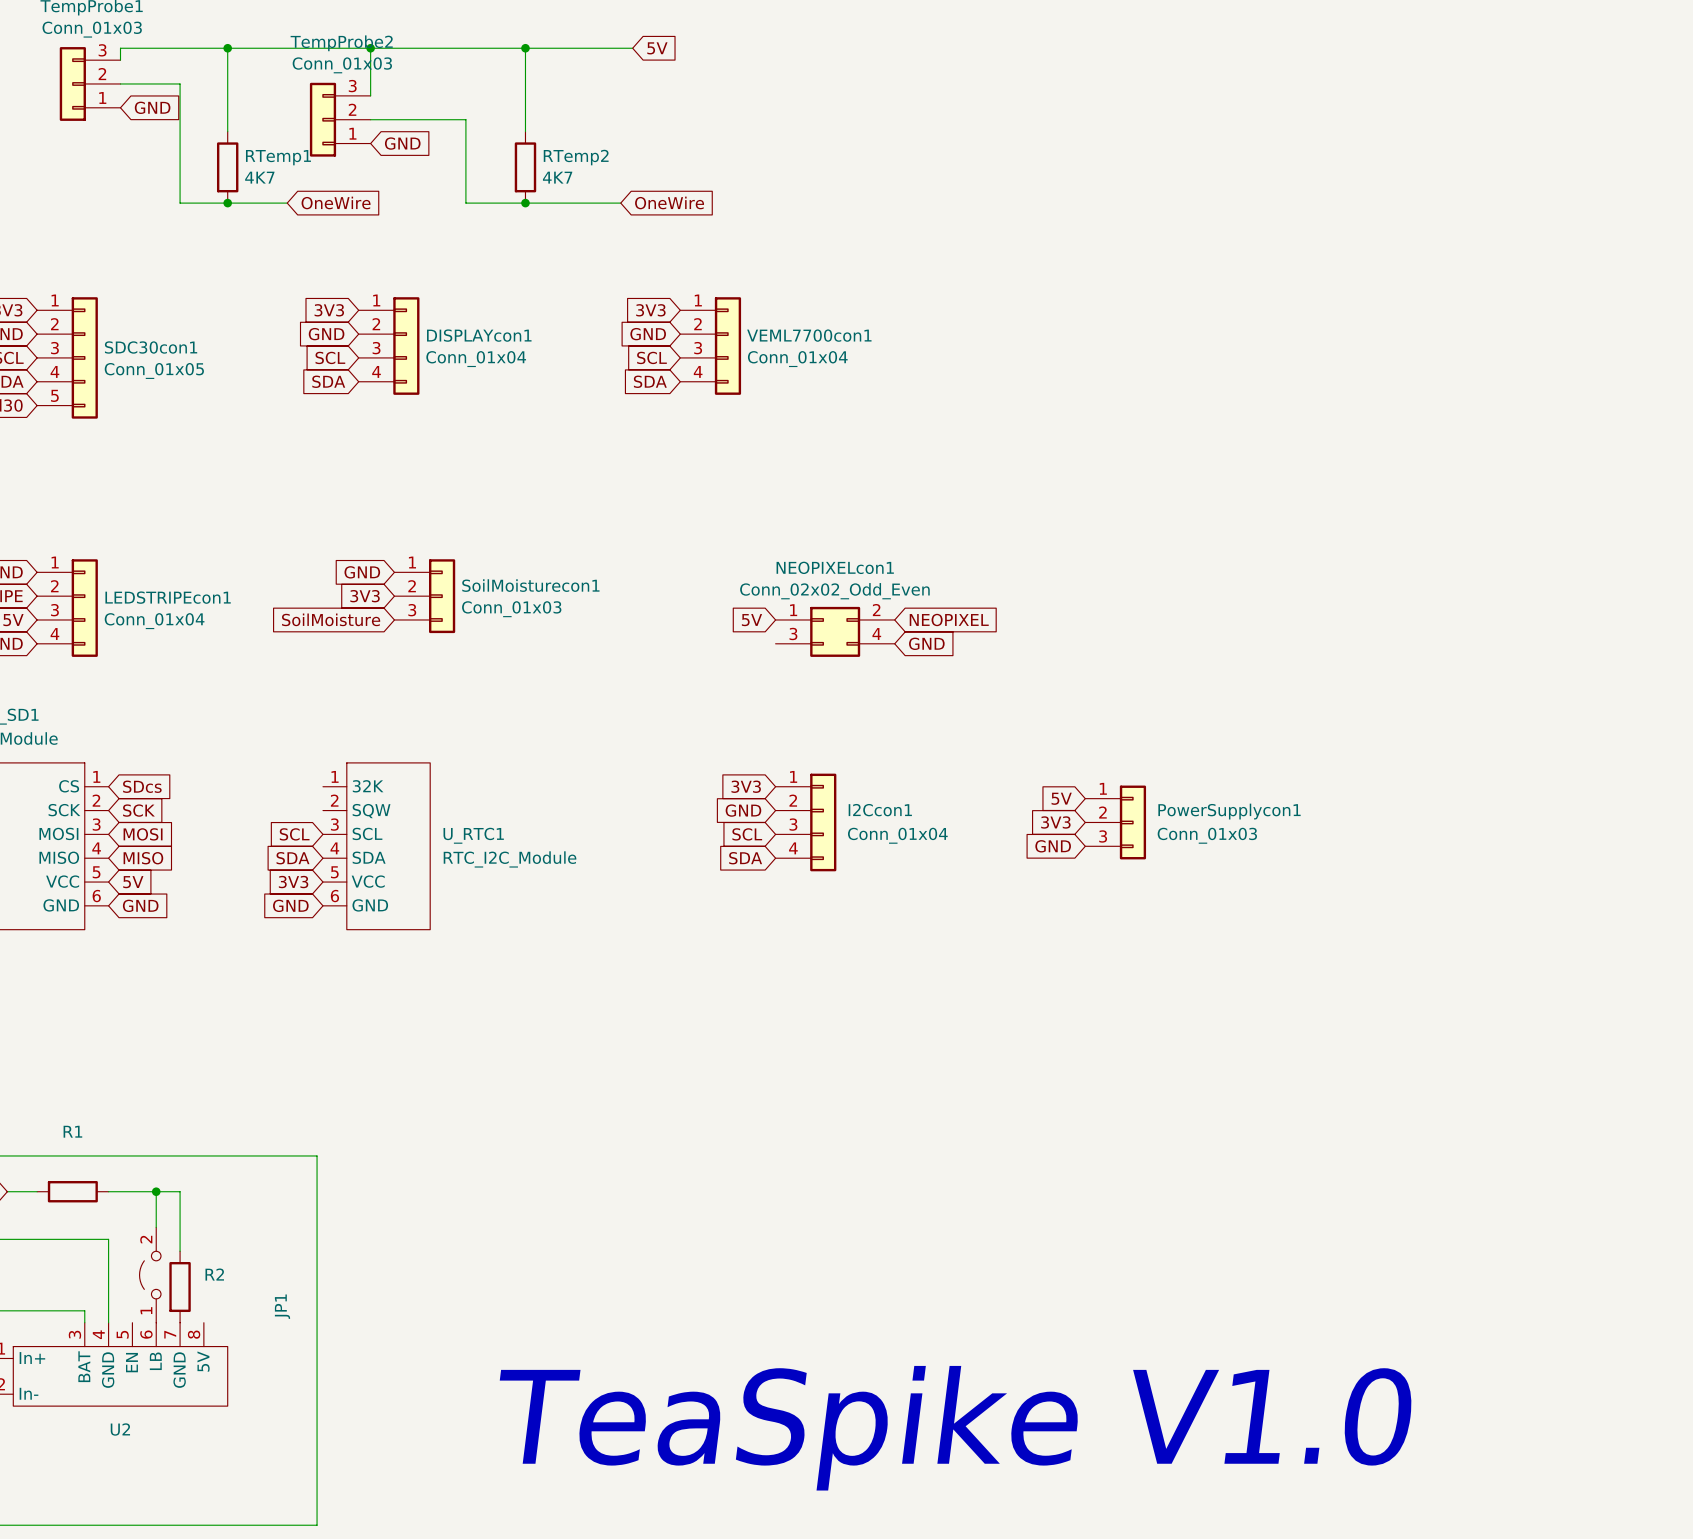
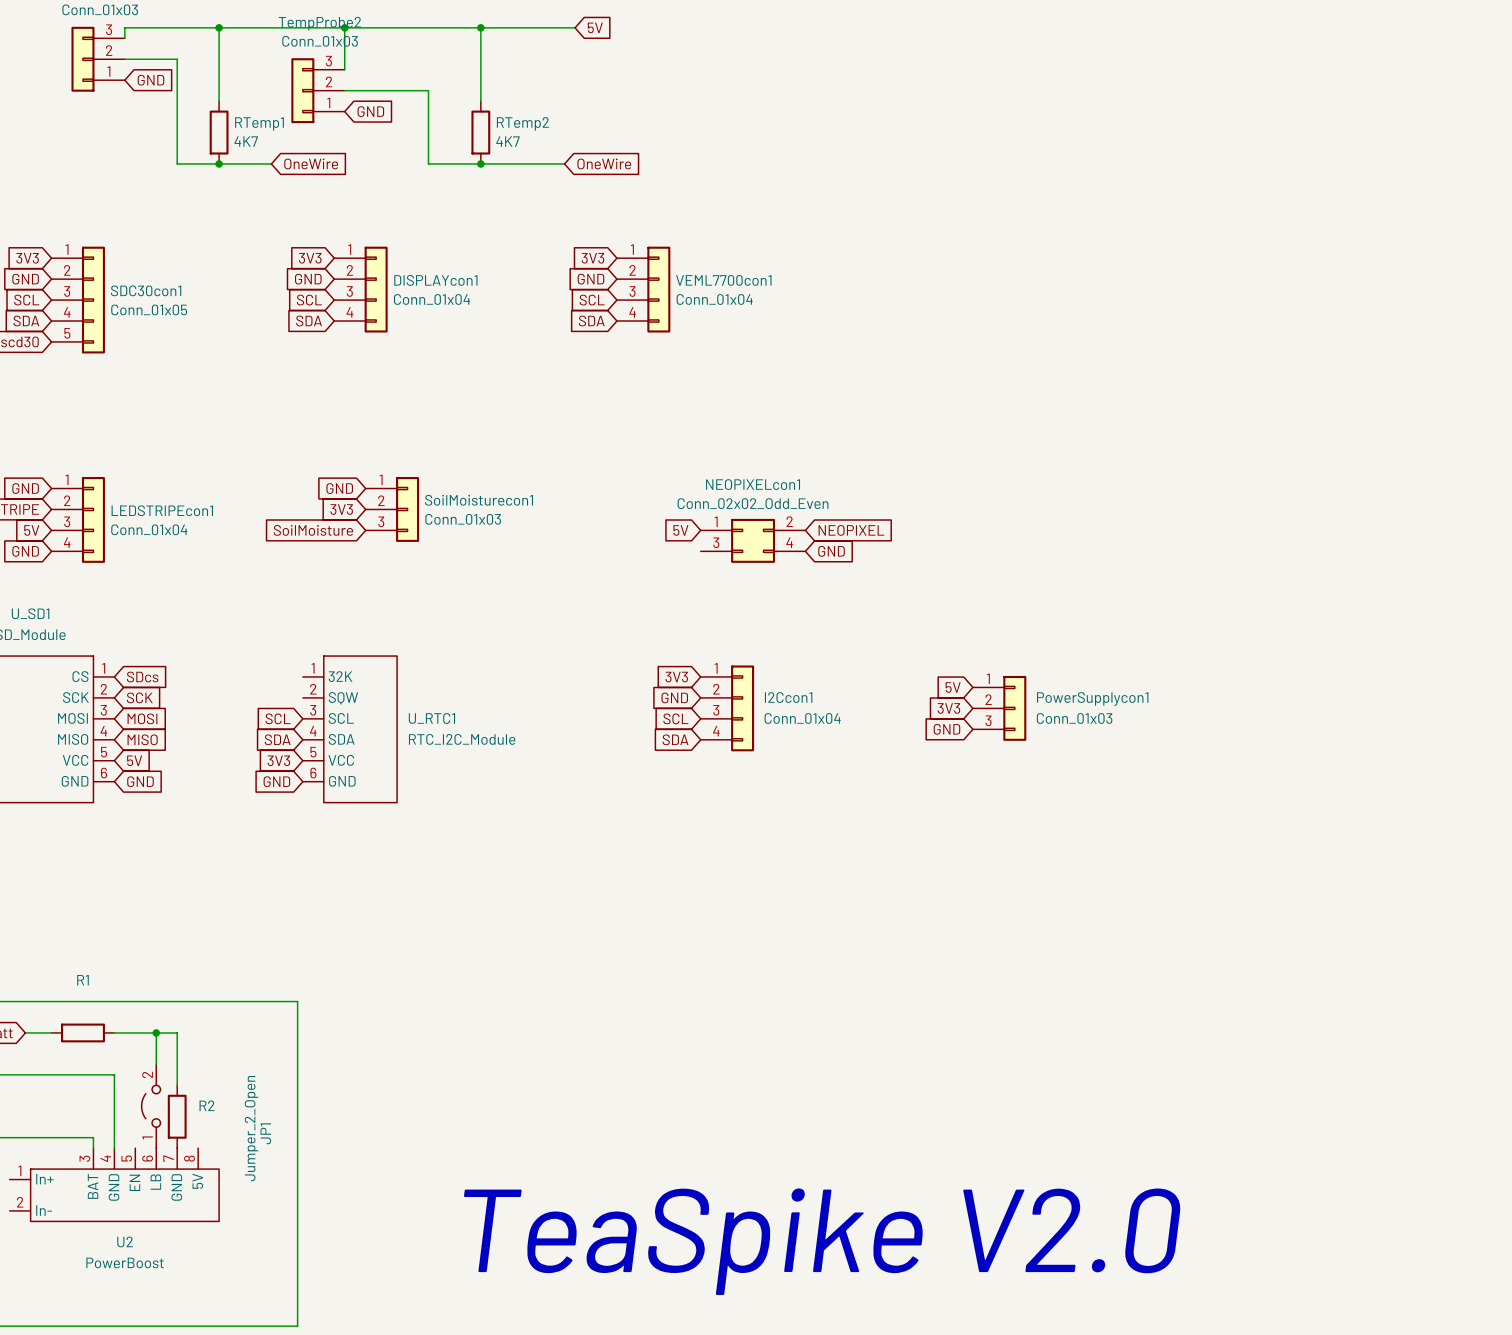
JP1 value: none -> Jumper_2_Open (251, 1128)
text: TeaSpike V1.0 (956, 1428) -> TeaSpike V2.0 (822, 1241)
U2 value: none -> PowerBoost (125, 1262)

